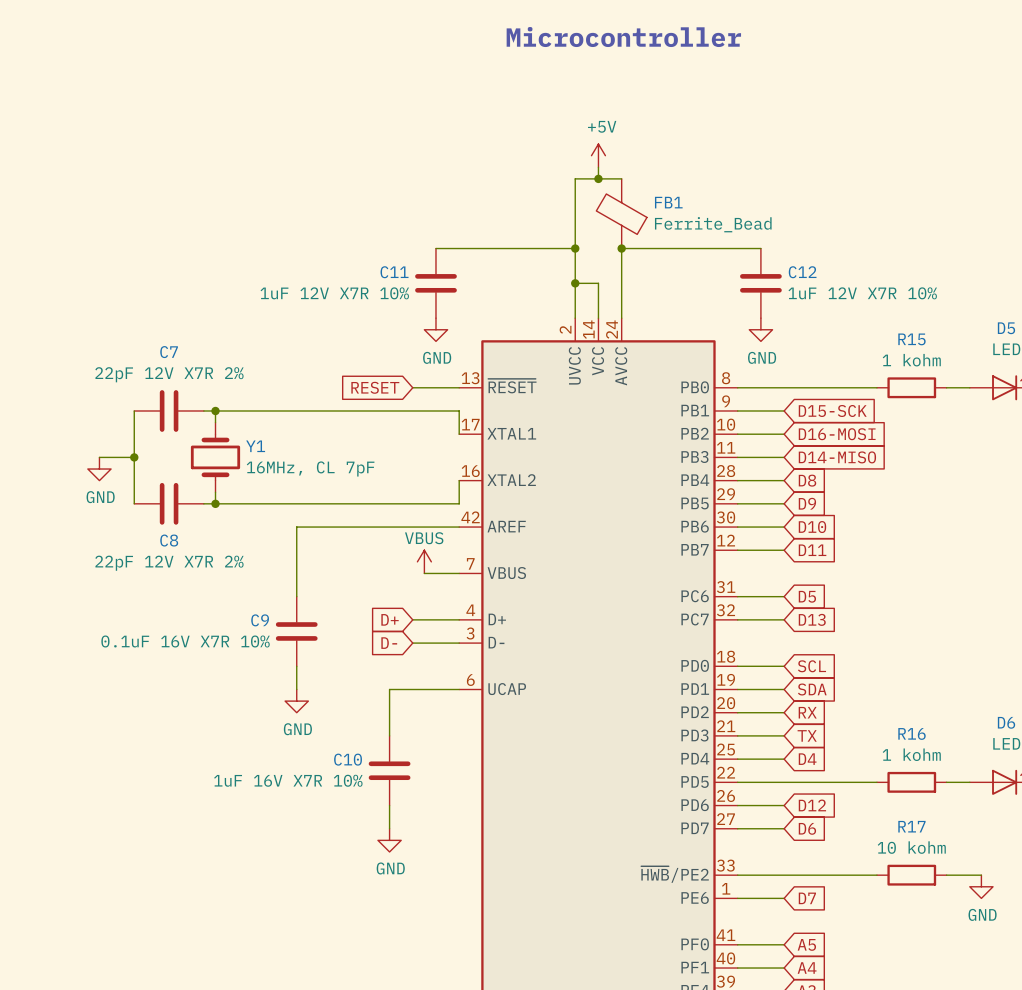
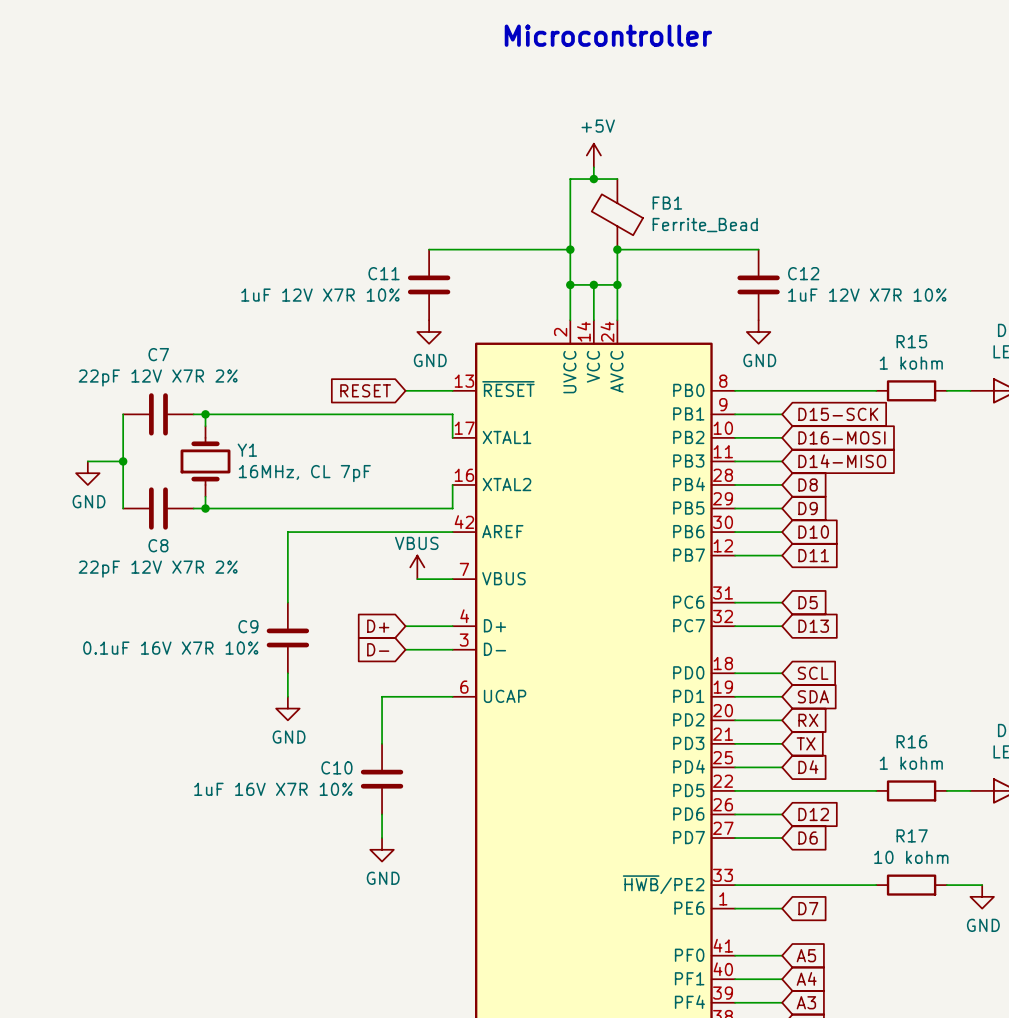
wire: none -> (593, 284) (617, 284)
junction: none -> (593, 284)
junction: none -> (617, 284)

